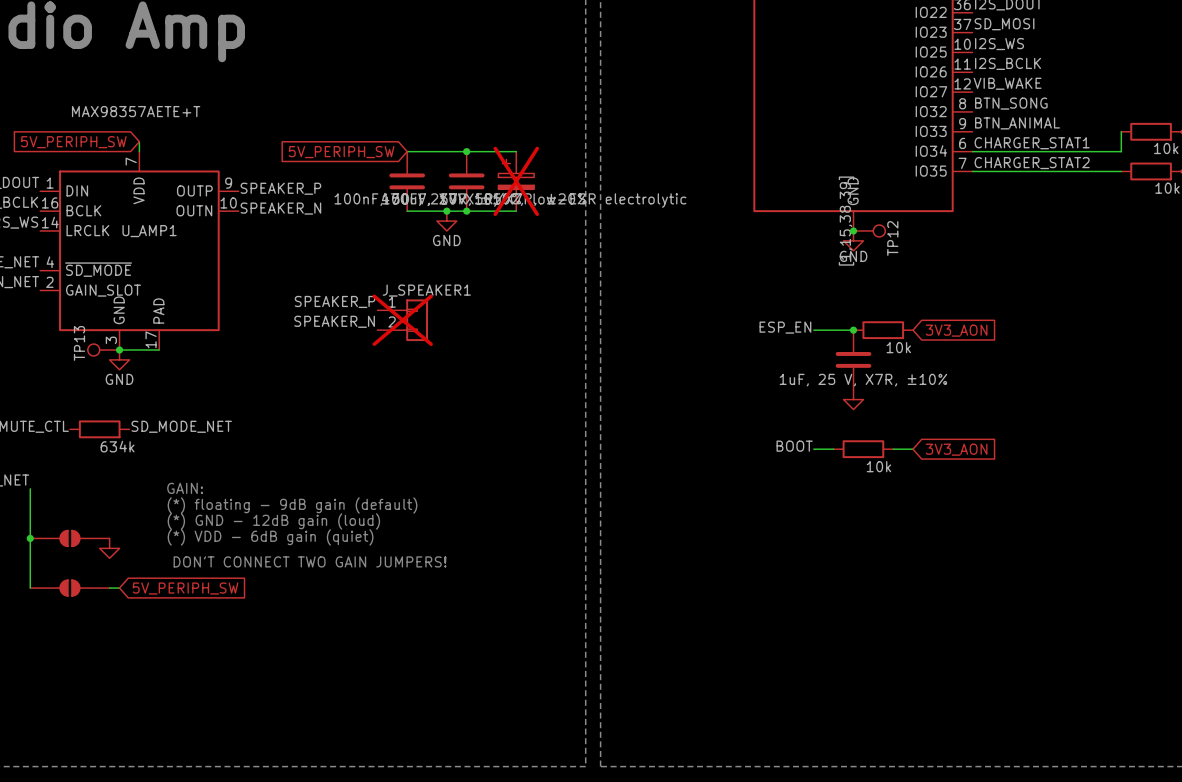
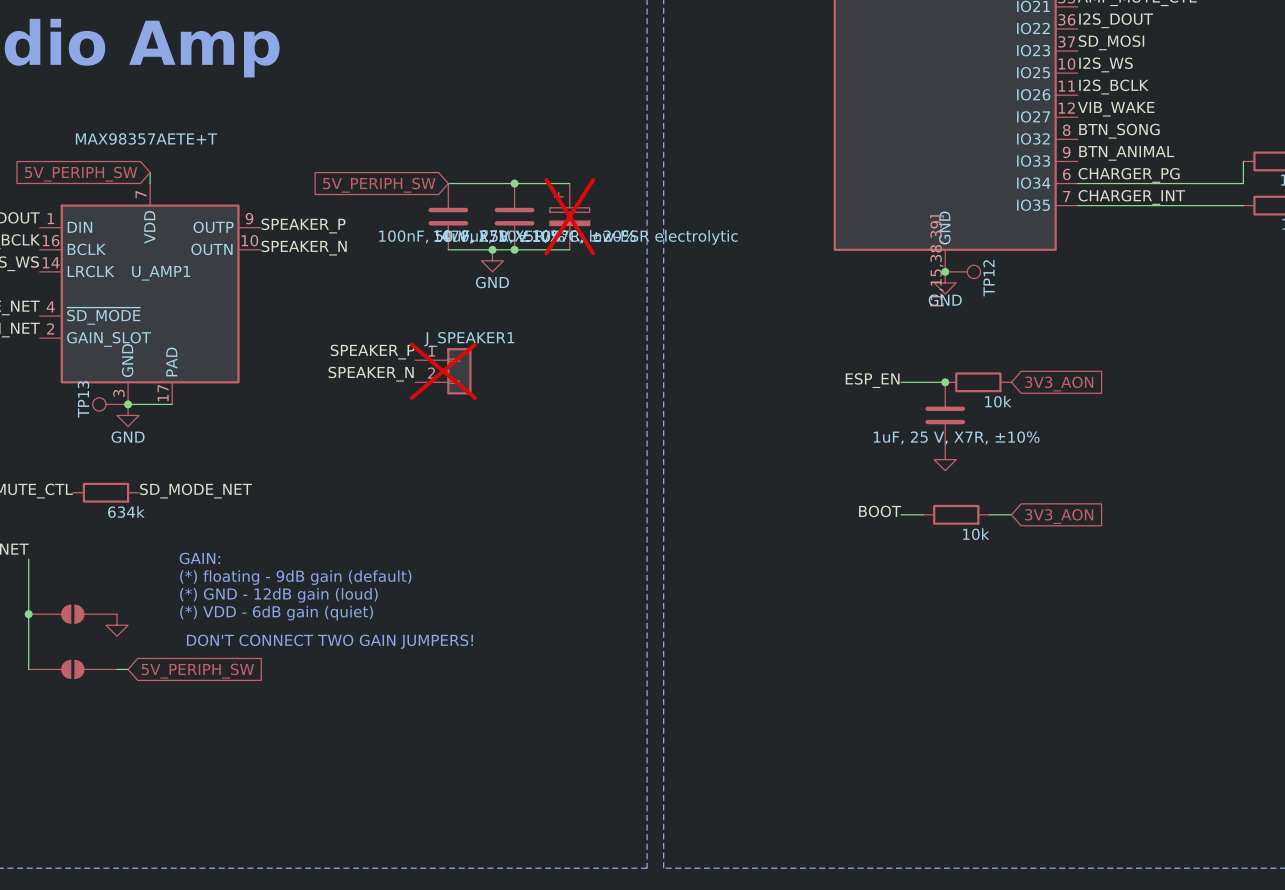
label: CHARGER_STAT1 (1032, 143) -> CHARGER_PG (1129, 175)
label: CHARGER_STAT2 (1032, 163) -> CHARGER_INT (1131, 197)

